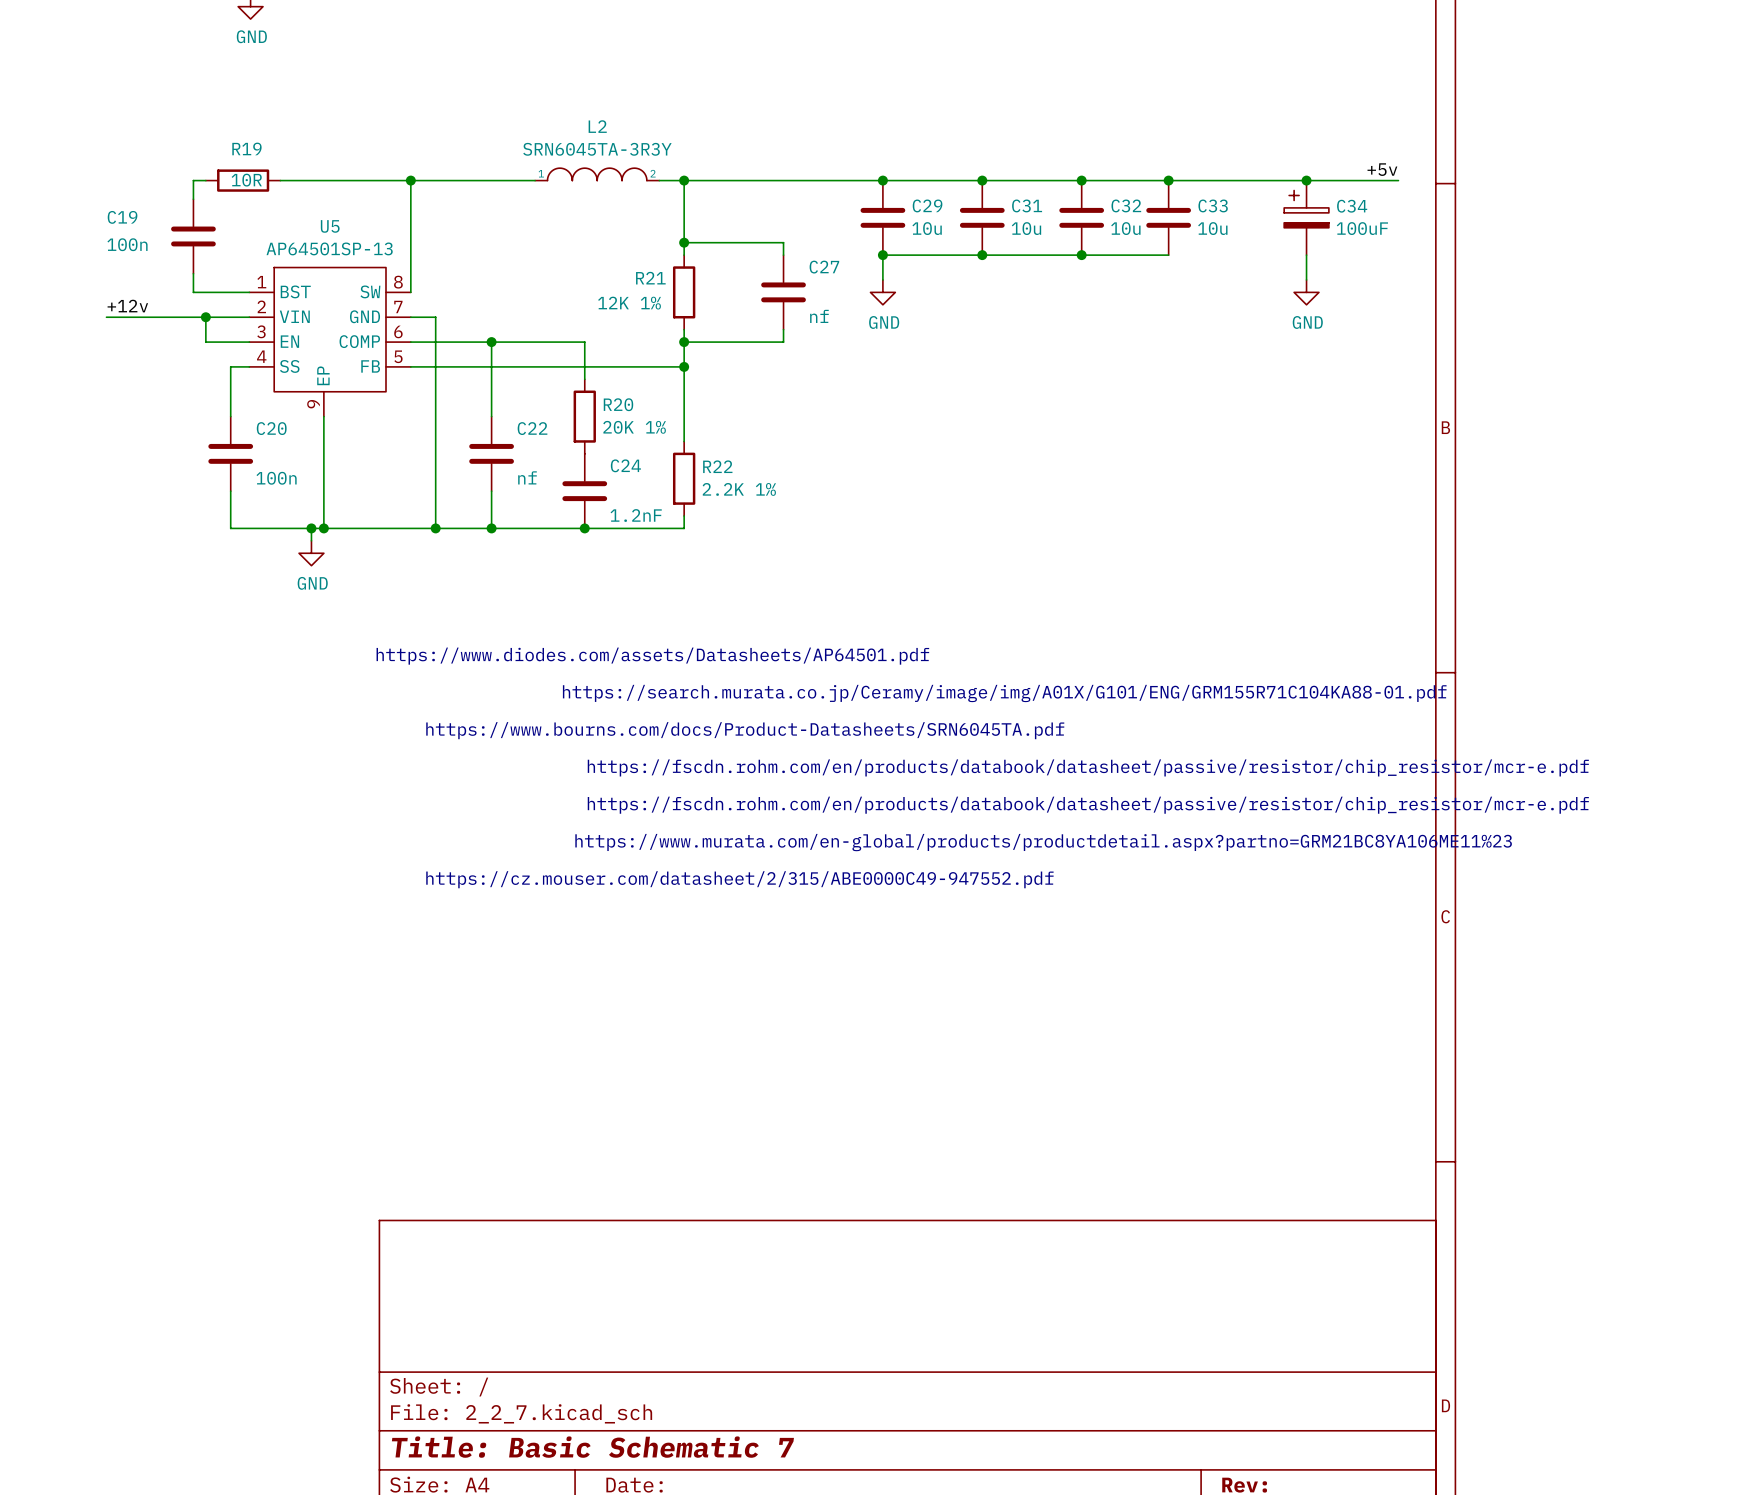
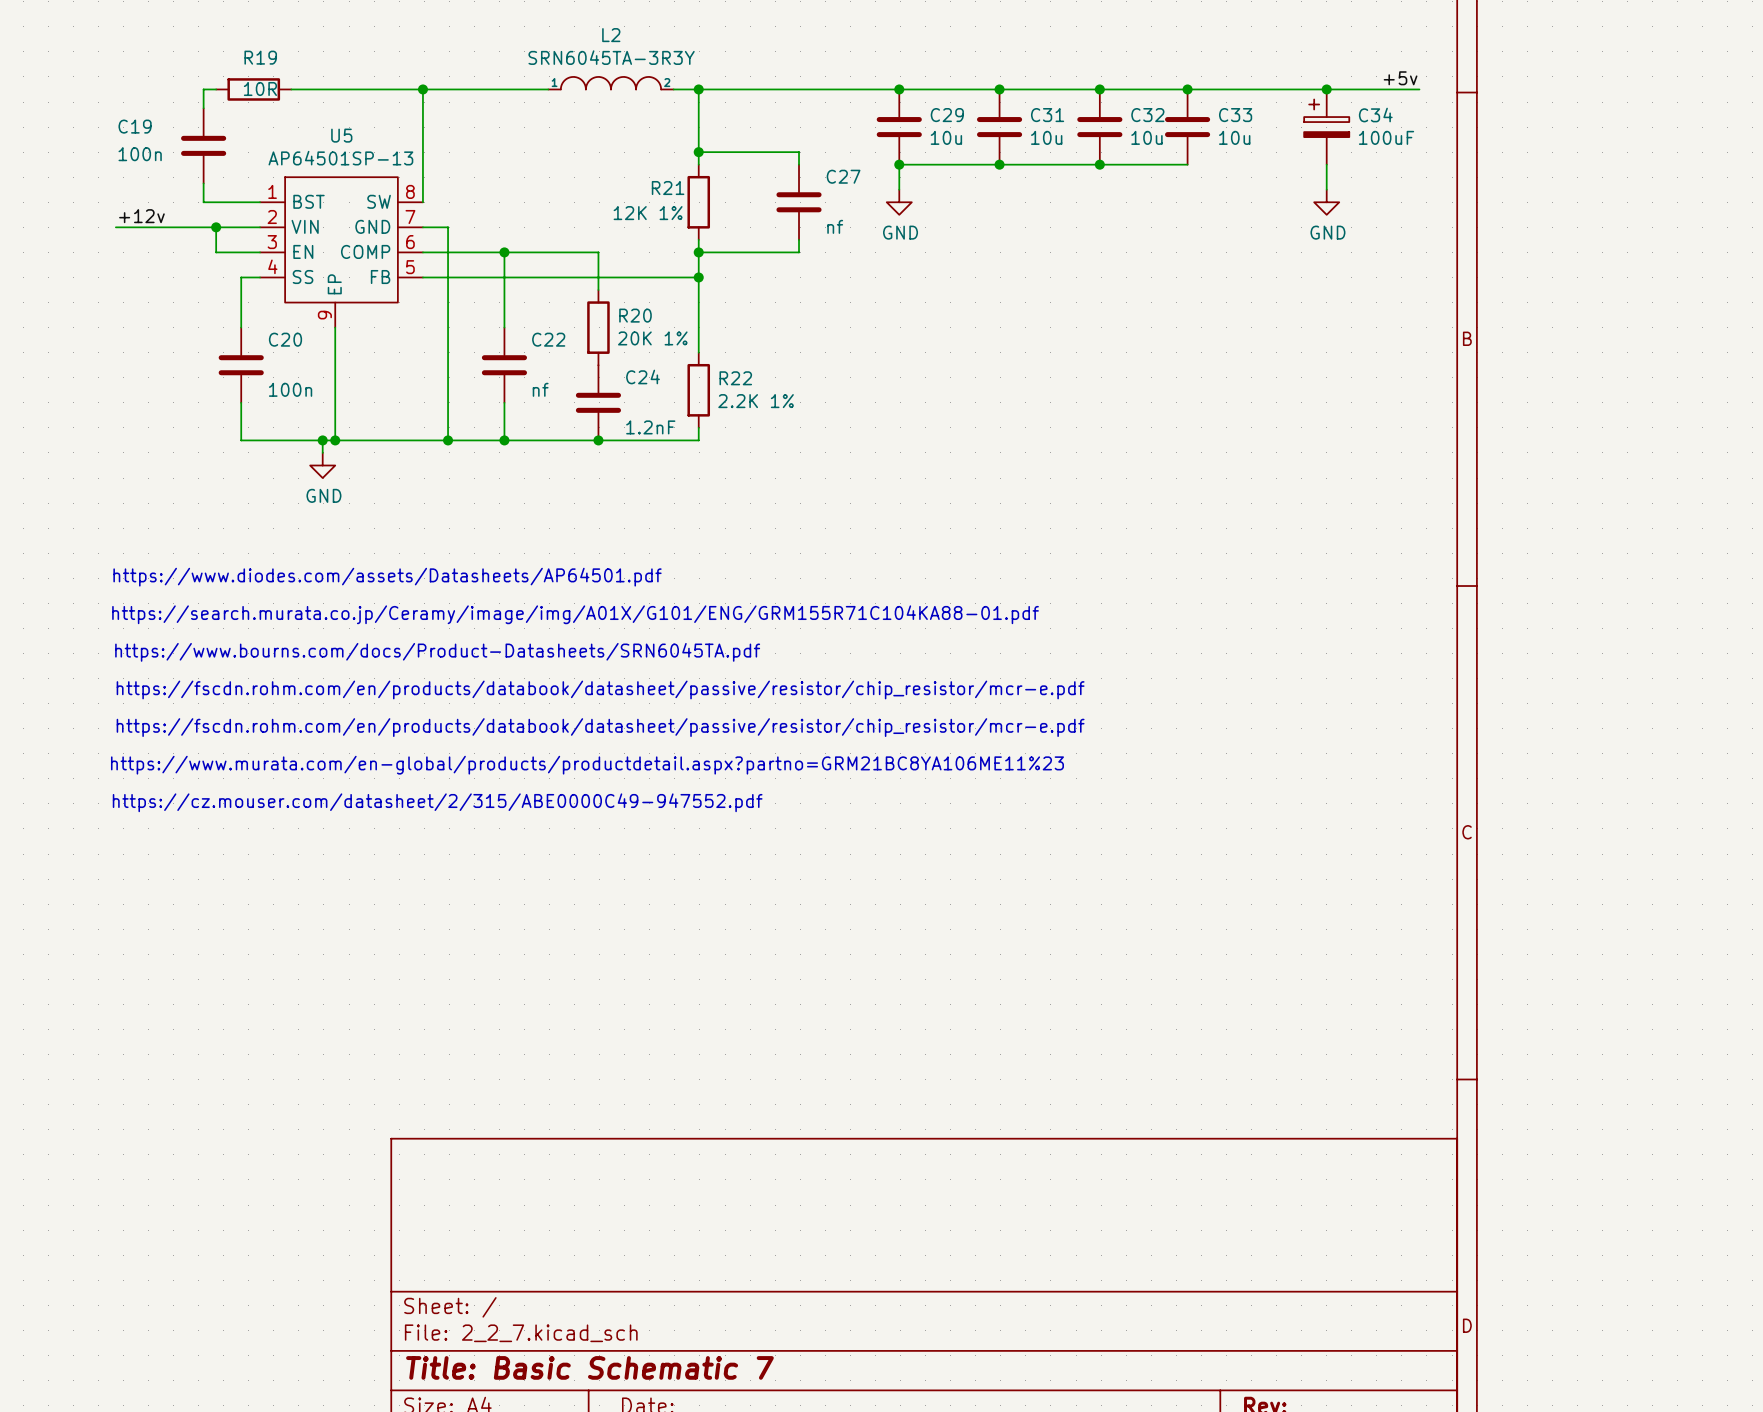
text position: https://www.diodes.com/assets/Datasheets/AP64501.pdf (652, 656) -> https://www.diodes.com/assets/Datasheets/AP64501.pdf (387, 577)
text position: https://search.murata.co.jp/Ceramy/image/img/A01X/G101/ENG/GRM155R71C104KA88-01.pdf (1004, 693) -> https://search.murata.co.jp/Ceramy/image/img/A01X/G101/ENG/GRM155R71C104KA88-01.pdf (575, 614)
text position: https://www.bourns.com/docs/Product-Datasheets/SRN6045TA.pdf (745, 730) -> https://www.bourns.com/docs/Product-Datasheets/SRN6045TA.pdf (437, 652)
text position: https://fscdn.rohm.com/en/products/databook/datasheet/passive/resistor/chip_resistor/mcr-e.pdf (1088, 767) -> https://fscdn.rohm.com/en/products/databook/datasheet/passive/resistor/chip_resistor/mcr-e.pdf (600, 689)
text position: https://fscdn.rohm.com/en/products/databook/datasheet/passive/resistor/chip_resistor/mcr-e.pdf (1088, 805) -> https://fscdn.rohm.com/en/products/databook/datasheet/passive/resistor/chip_resistor/mcr-e.pdf (600, 727)
text position: https://www.murata.com/en-global/products/productdetail.aspx?partno=GRM21BC8YA106ME11%23 (1043, 842) -> https://www.murata.com/en-global/products/productdetail.aspx?partno=GRM21BC8YA106ME11%23 (587, 765)
text position: https://cz.mouser.com/datasheet/2/315/ABE0000C49-947552.pdf (739, 879) -> https://cz.mouser.com/datasheet/2/315/ABE0000C49-947552.pdf (437, 802)

